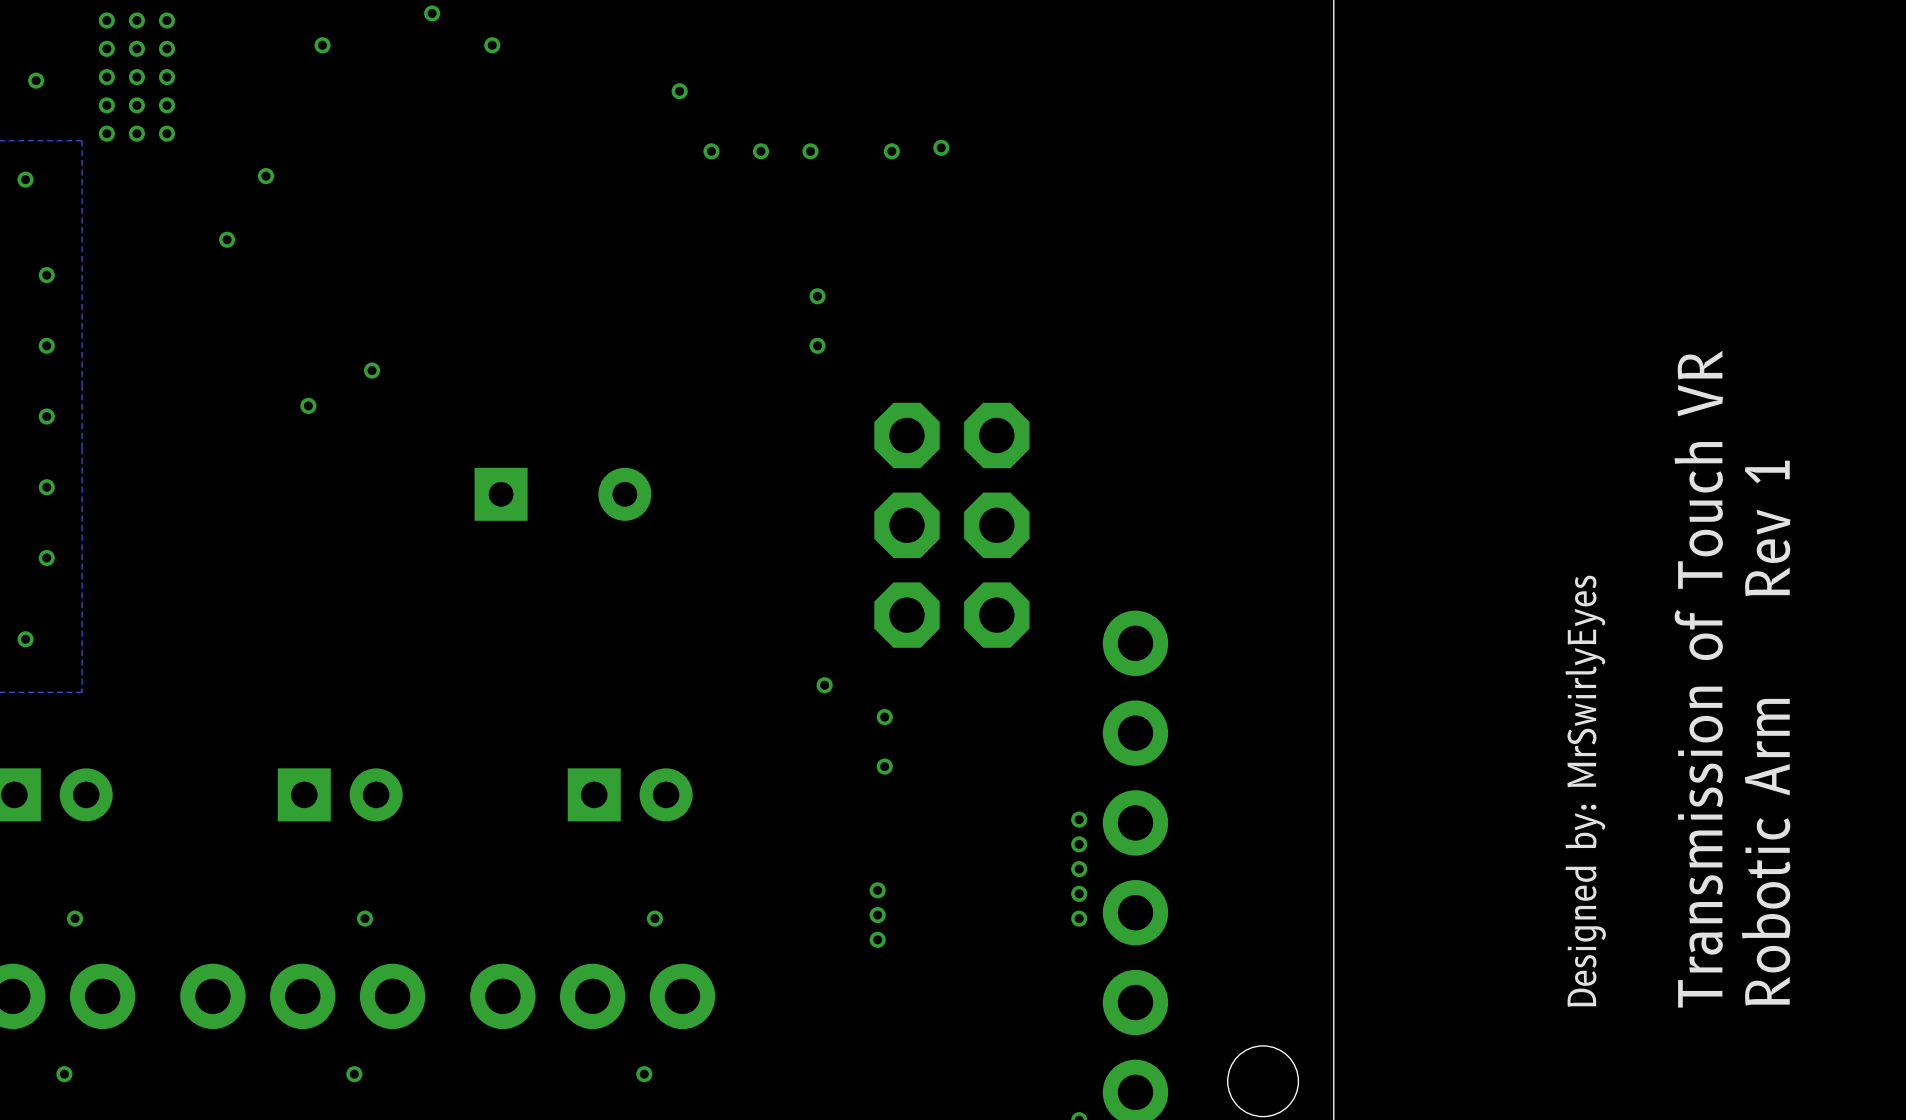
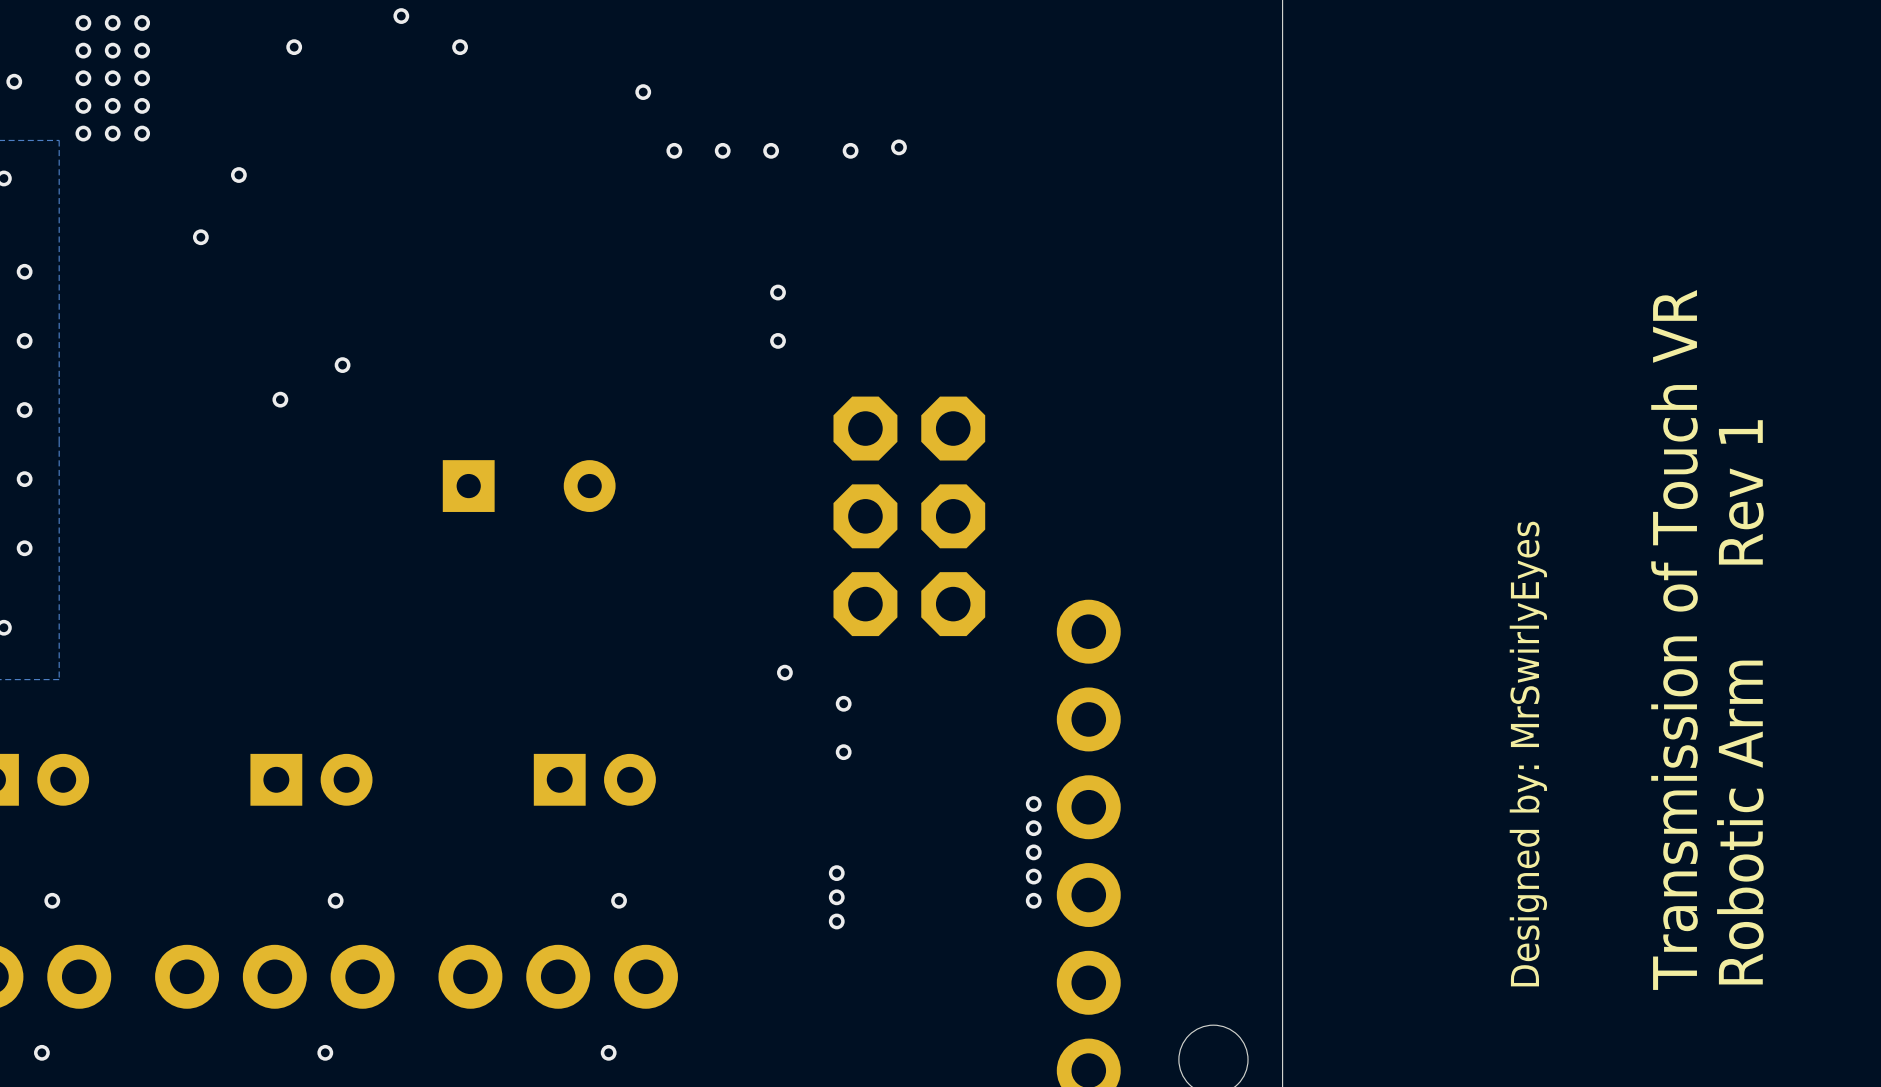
text position: Transmission of Touch VR (1698, 679) -> Transmission of Touch VR (1674, 640)
text position: Robotic Arm Rev 1 (1766, 733) -> Robotic Arm Rev 1 (1740, 702)

